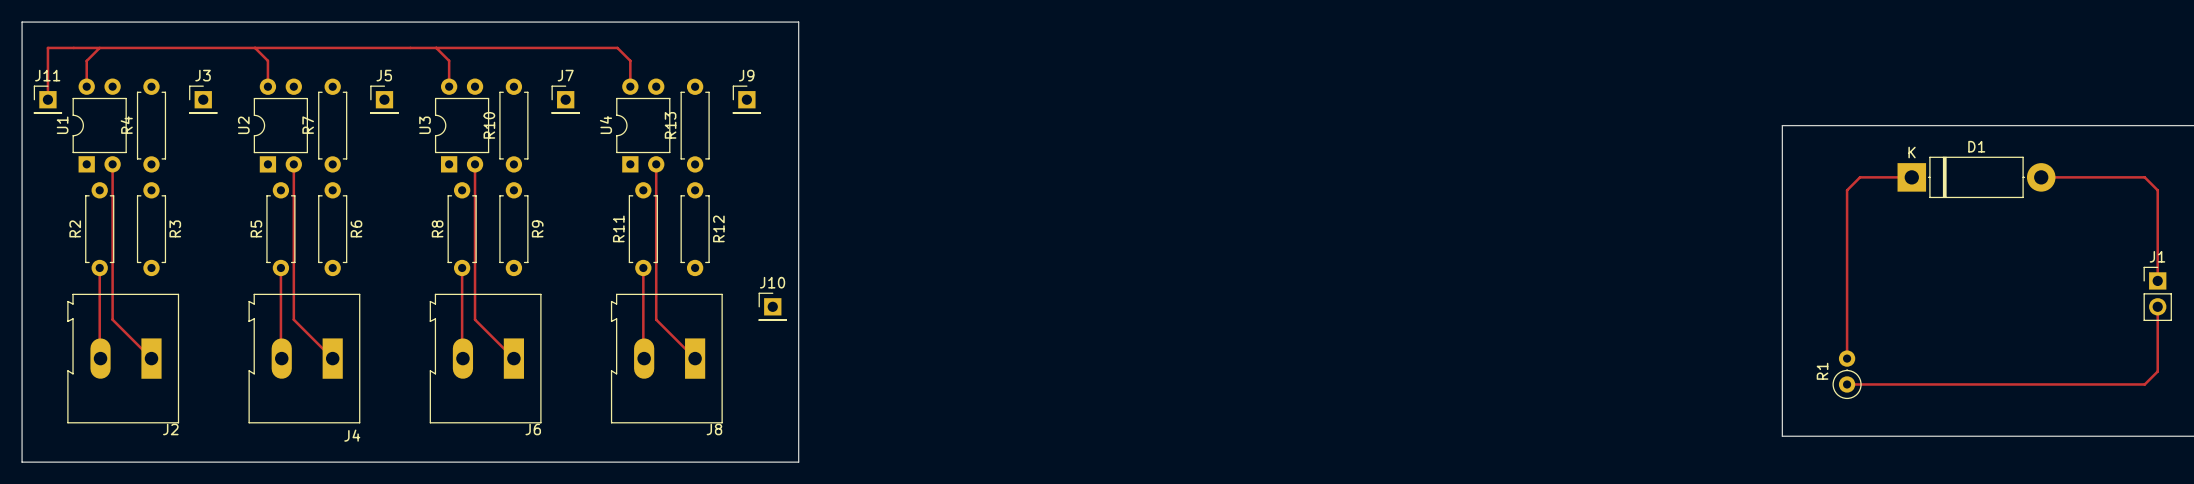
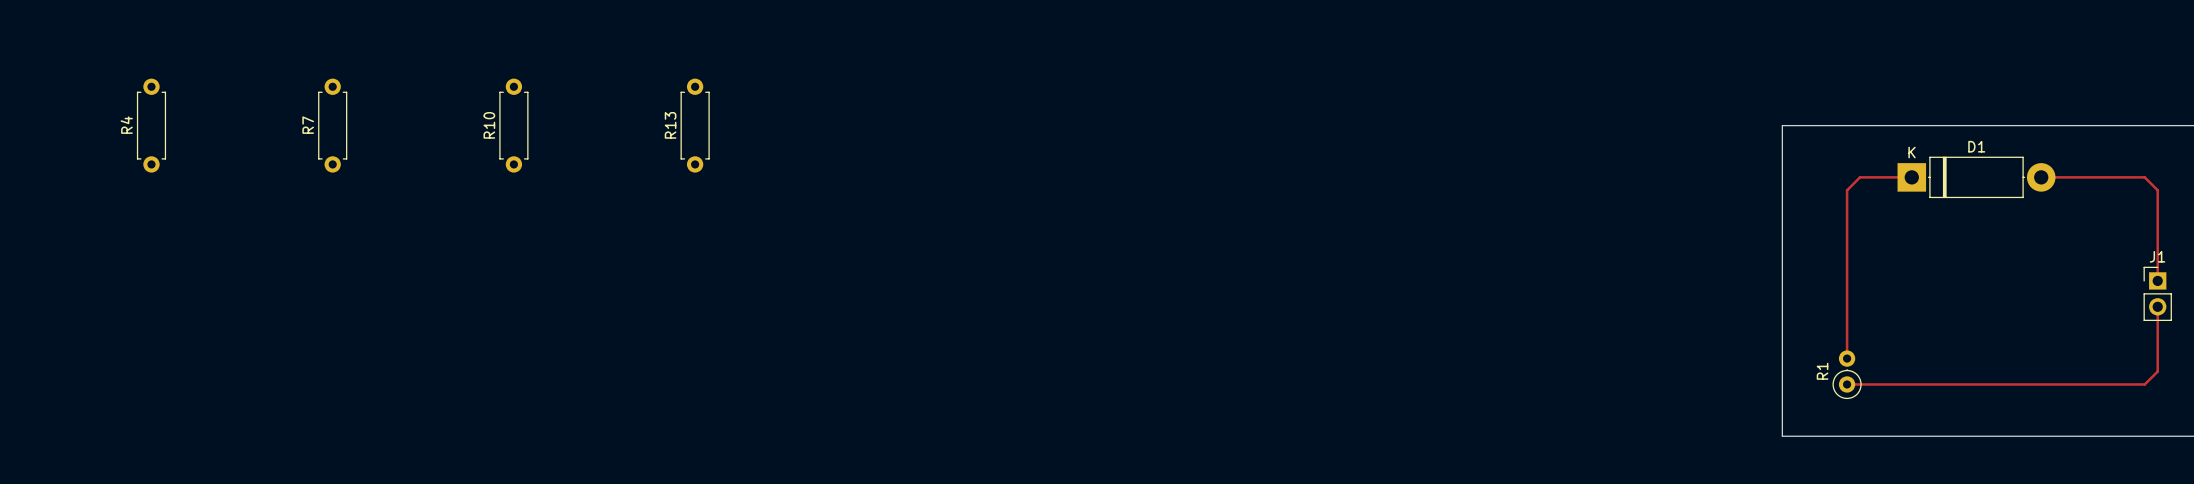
board edge: (22, 22) (798, 22) (798, 462) (22, 462) (22, 22) -> none
track: (99, 47) (86, 60) (86, 86) -> none
track: (255, 47) (267, 60) (267, 86) -> none
track: (436, 47) (449, 60) (449, 86) -> none
track: (630, 86) (630, 60) (617, 47) (47, 47) (47, 99) -> none
J11: (47, 99) -> none
J3: (203, 99) -> none
J5: (384, 99) -> none
J7: (565, 99) -> none
J9: (746, 99) -> none
U1: (99, 125) -> none
U2: (280, 125) -> none
U3: (462, 125) -> none
U4: (643, 125) -> none
track: (112, 164) (112, 319) (151, 358) -> none
track: (293, 164) (293, 319) (332, 358) -> none
track: (475, 164) (475, 319) (513, 358) -> none
track: (656, 164) (656, 319) (695, 358) -> none
R2: (99, 229) -> none
R3: (151, 229) -> none
R5: (280, 229) -> none
R6: (332, 229) -> none
R8: (462, 229) -> none
R9: (513, 229) -> none
R11: (643, 229) -> none
R12: (695, 229) -> none
track: (99, 267) (100, 358) -> none
track: (280, 267) (281, 358) -> none
track: (462, 267) (462, 358) -> none
track: (643, 267) (644, 358) -> none
J10: (772, 306) -> none
J2: (123, 358) -> none
J4: (304, 358) -> none
J6: (485, 358) -> none
J8: (666, 358) -> none

